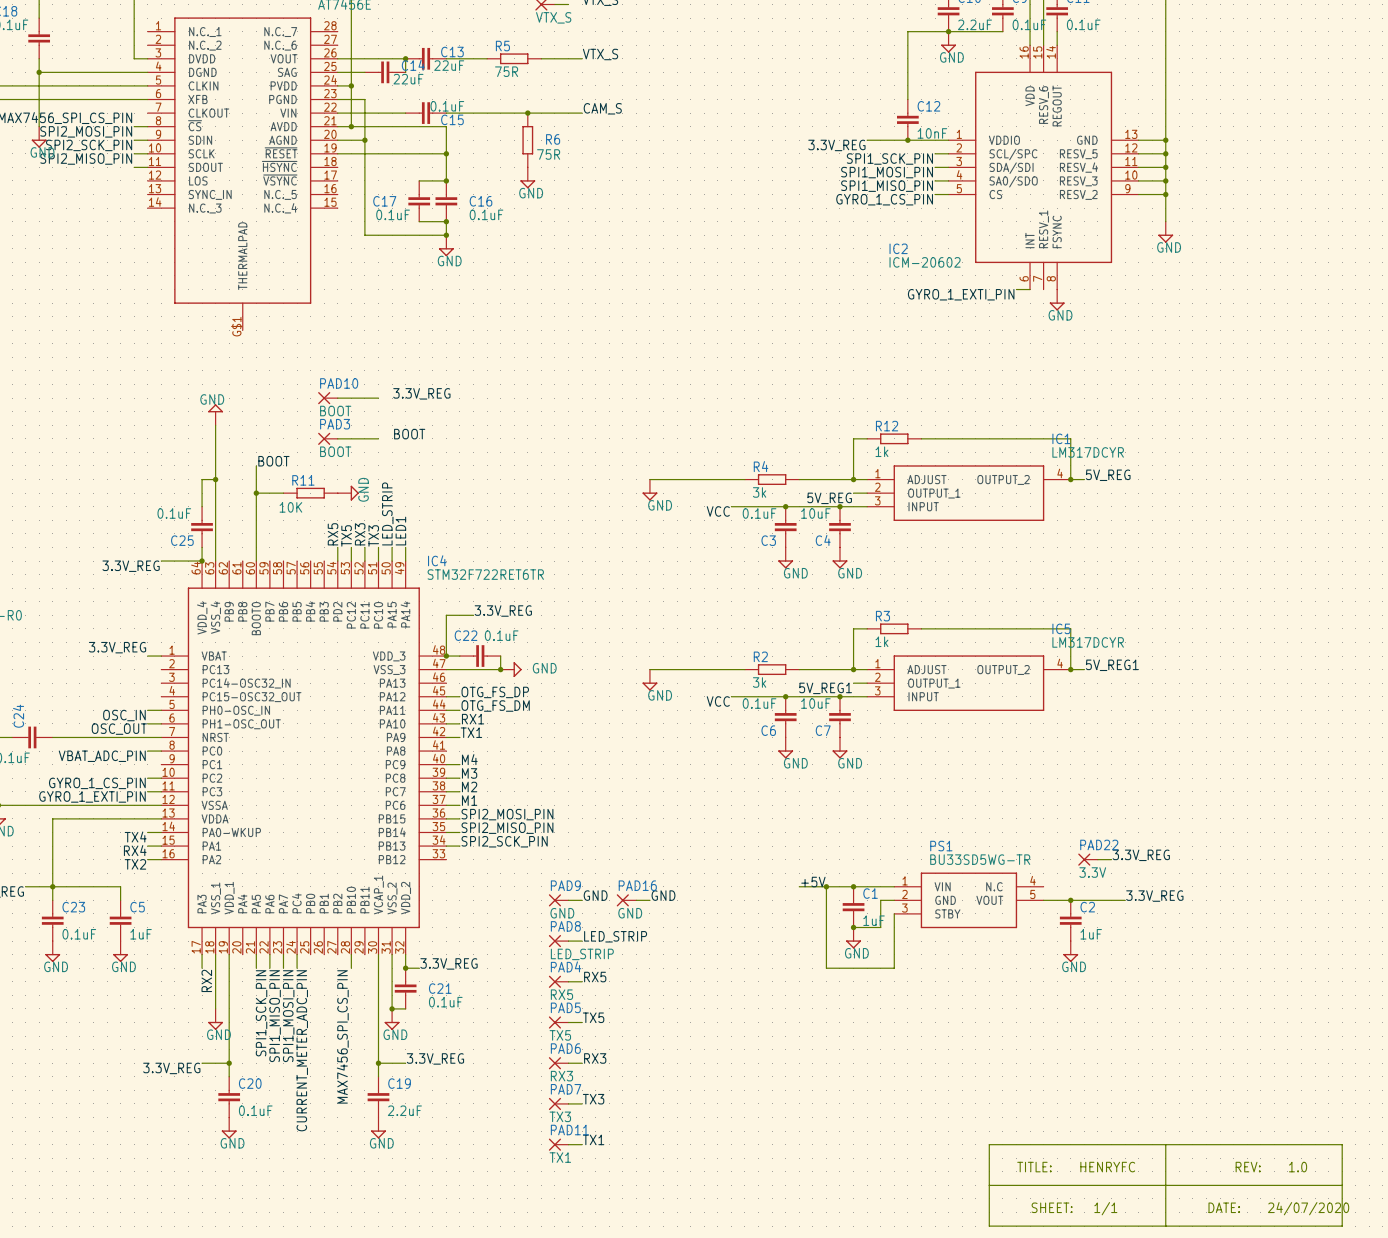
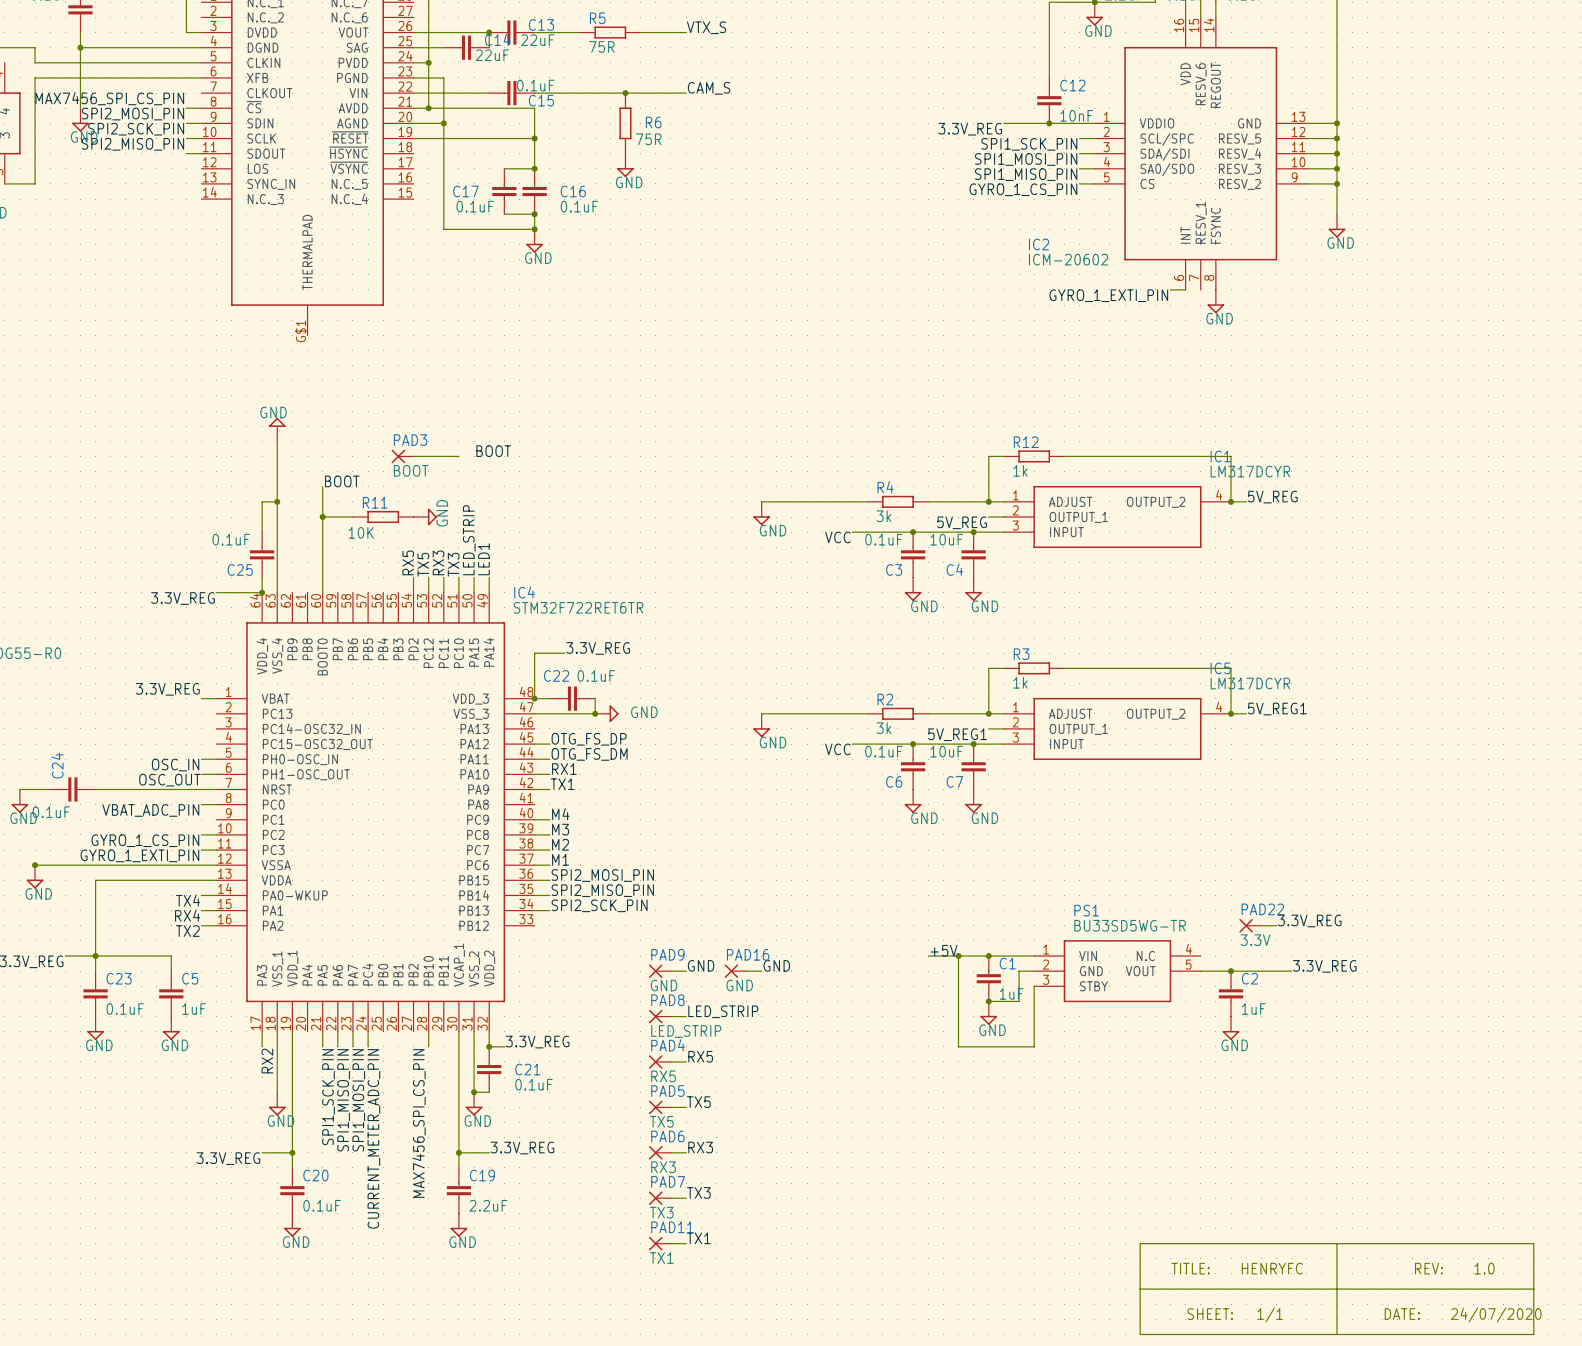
label: 3.3V_REG (421, 393) -> none
PAD10: BOOT (327, 398) -> none
wire: (337, 398) (378, 398) -> none

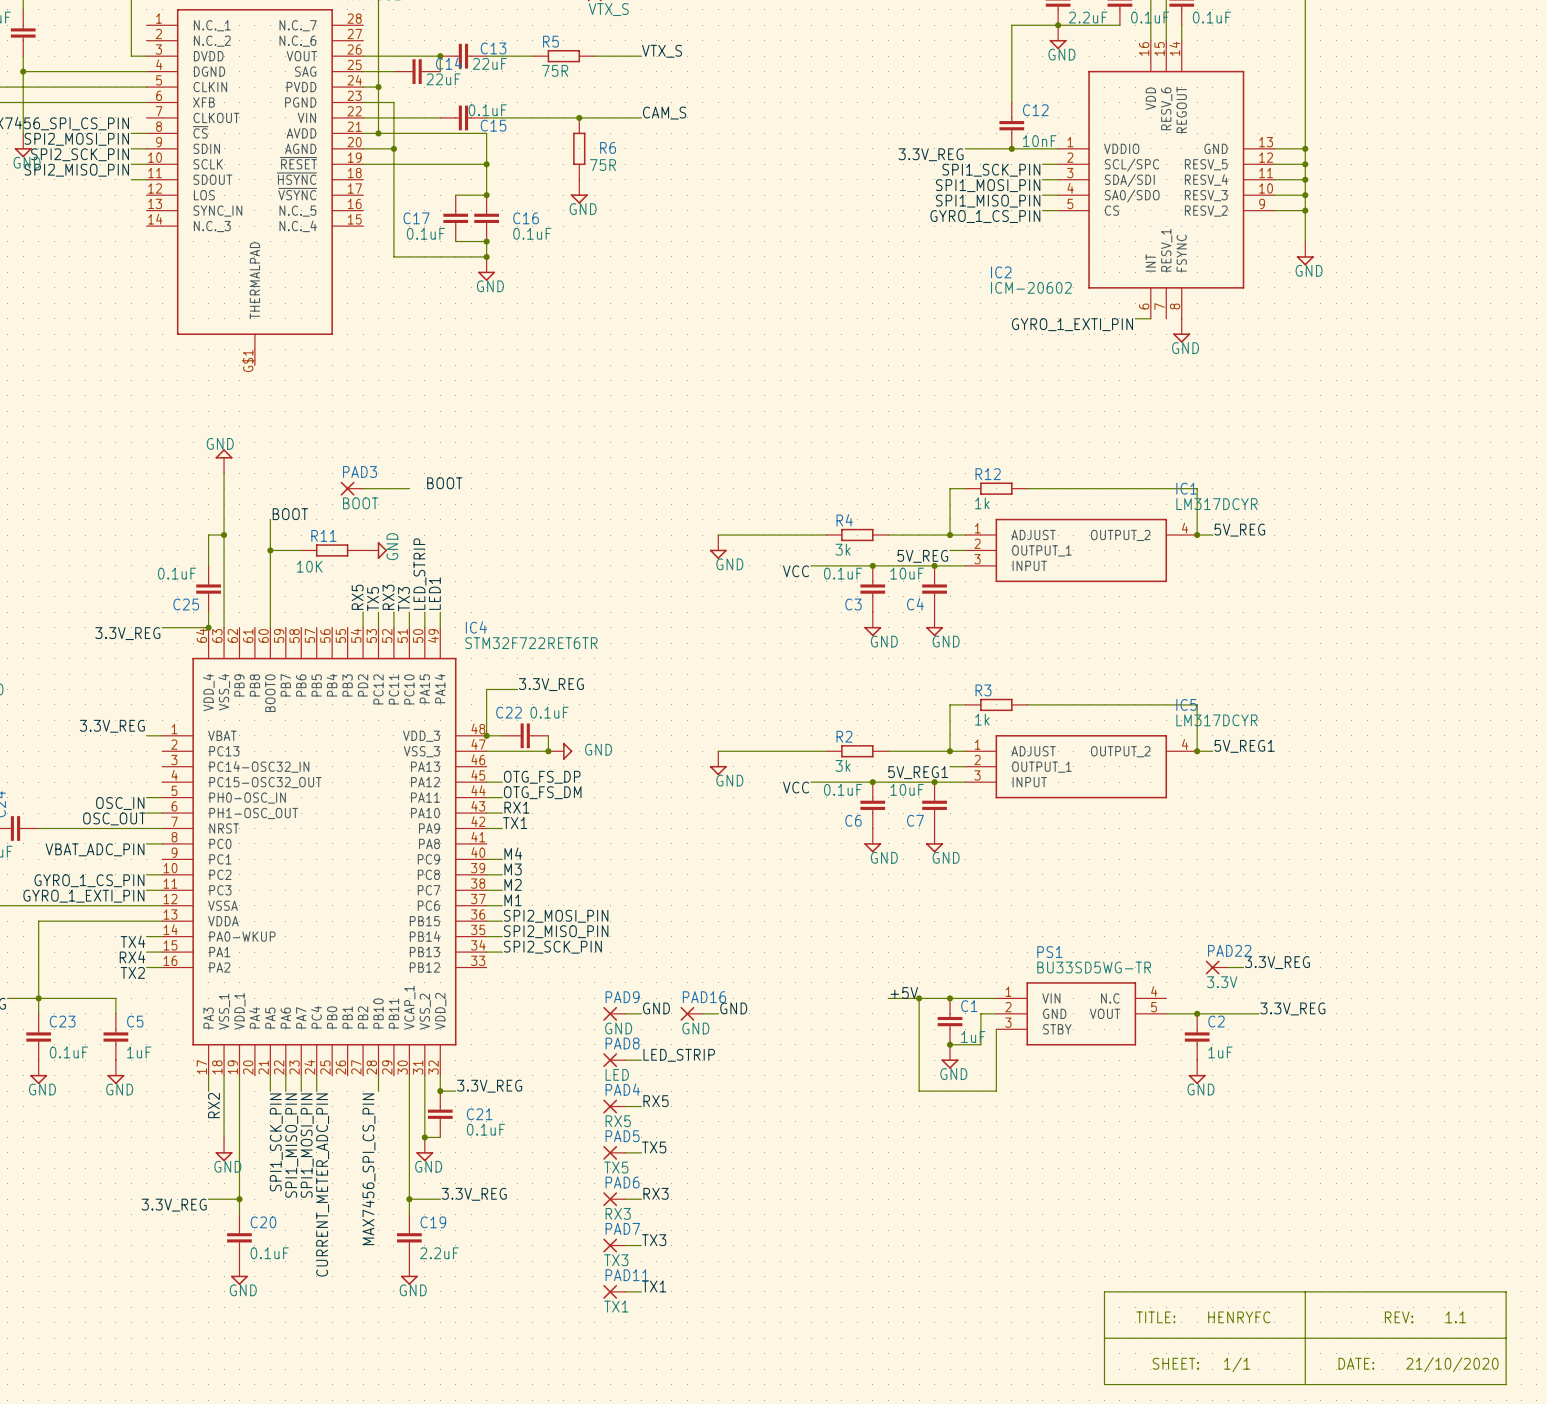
PAD8 value: LED_STRIP (686, 1031) -> LED (617, 1074)
text: REV: 1.0 (1454, 1268) -> REV: 1.1 (1425, 1317)
text: DATE: 24/07/2020 (1463, 1315) -> DATE: 21/10/2020 (1418, 1364)

